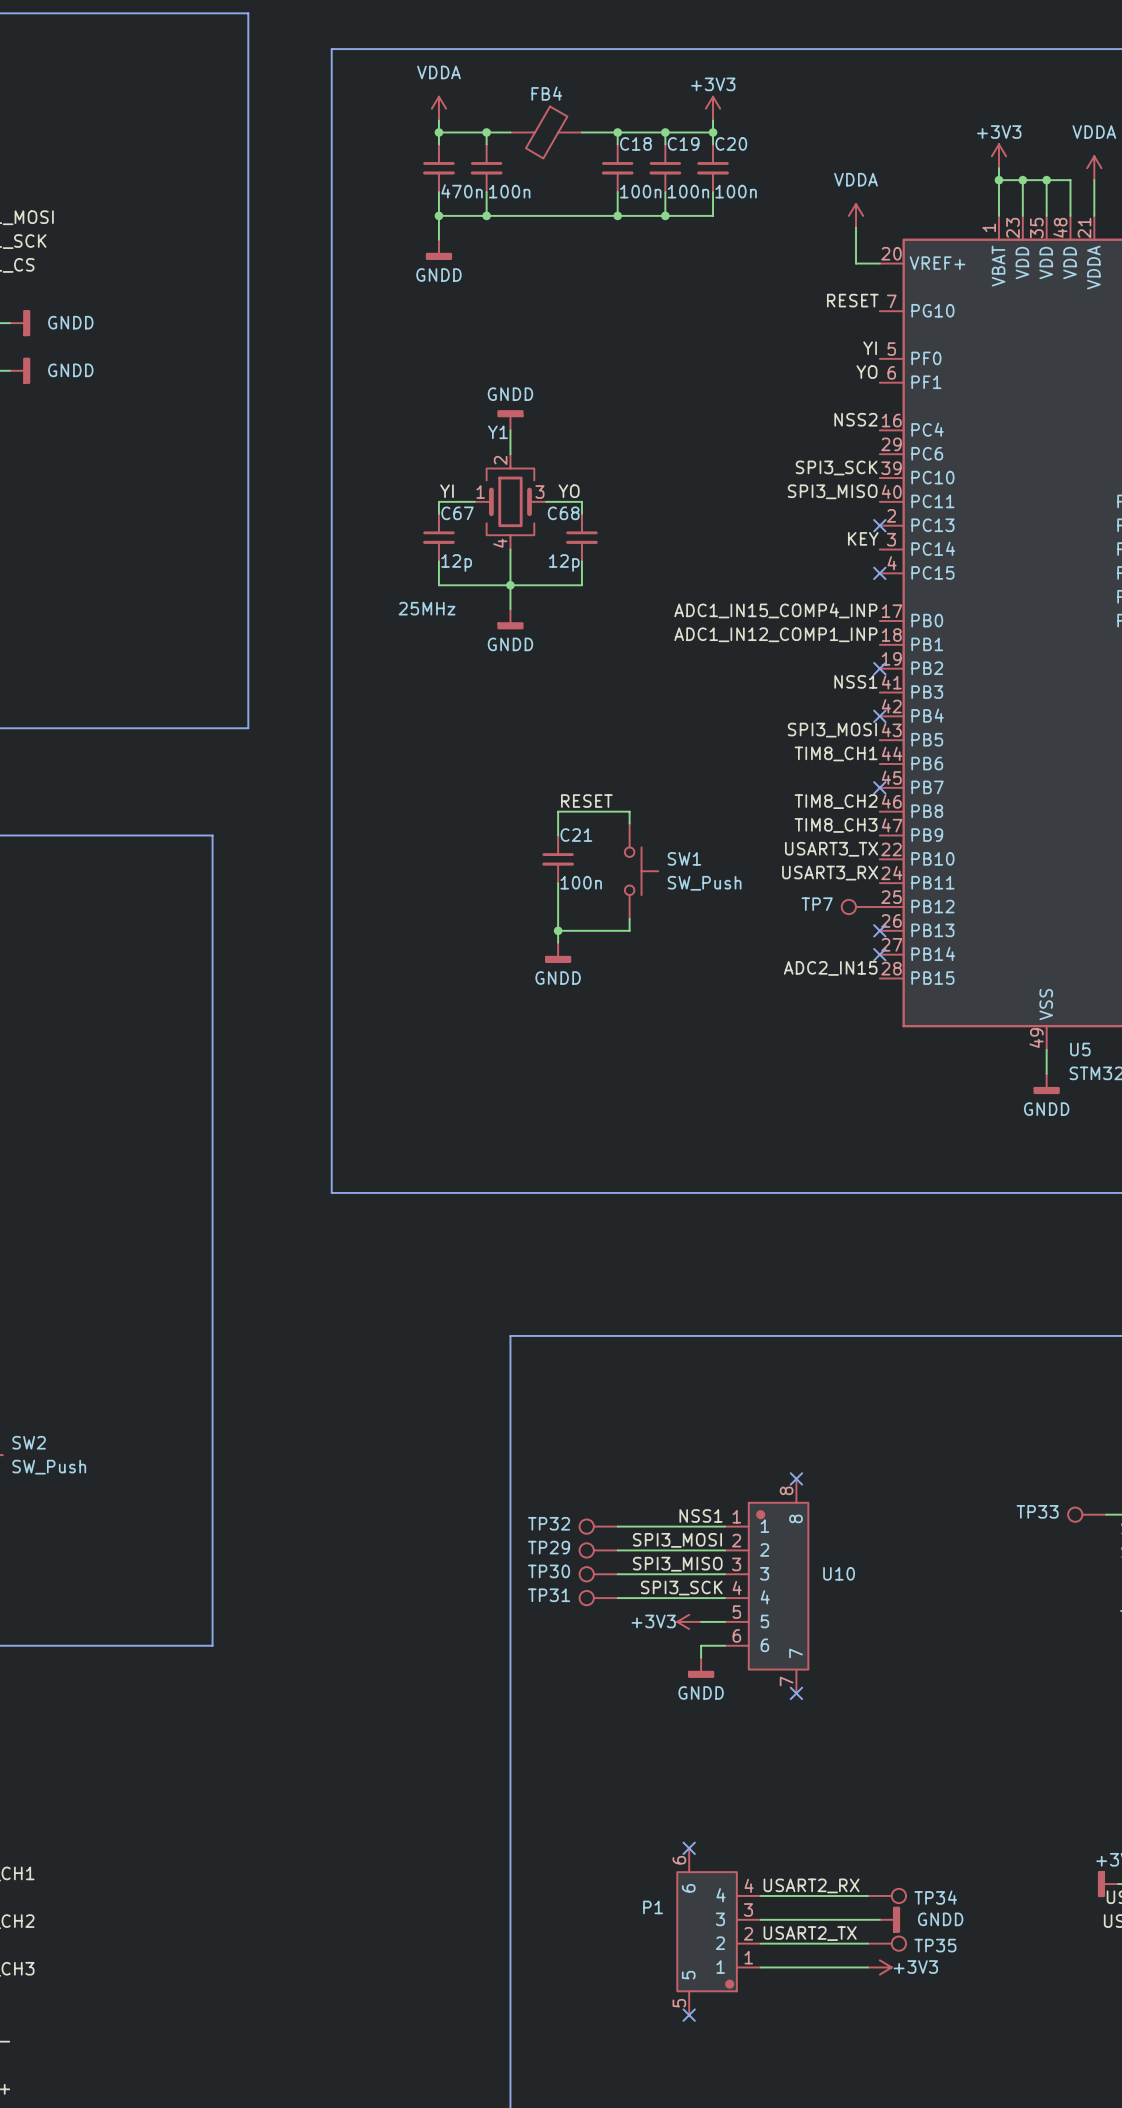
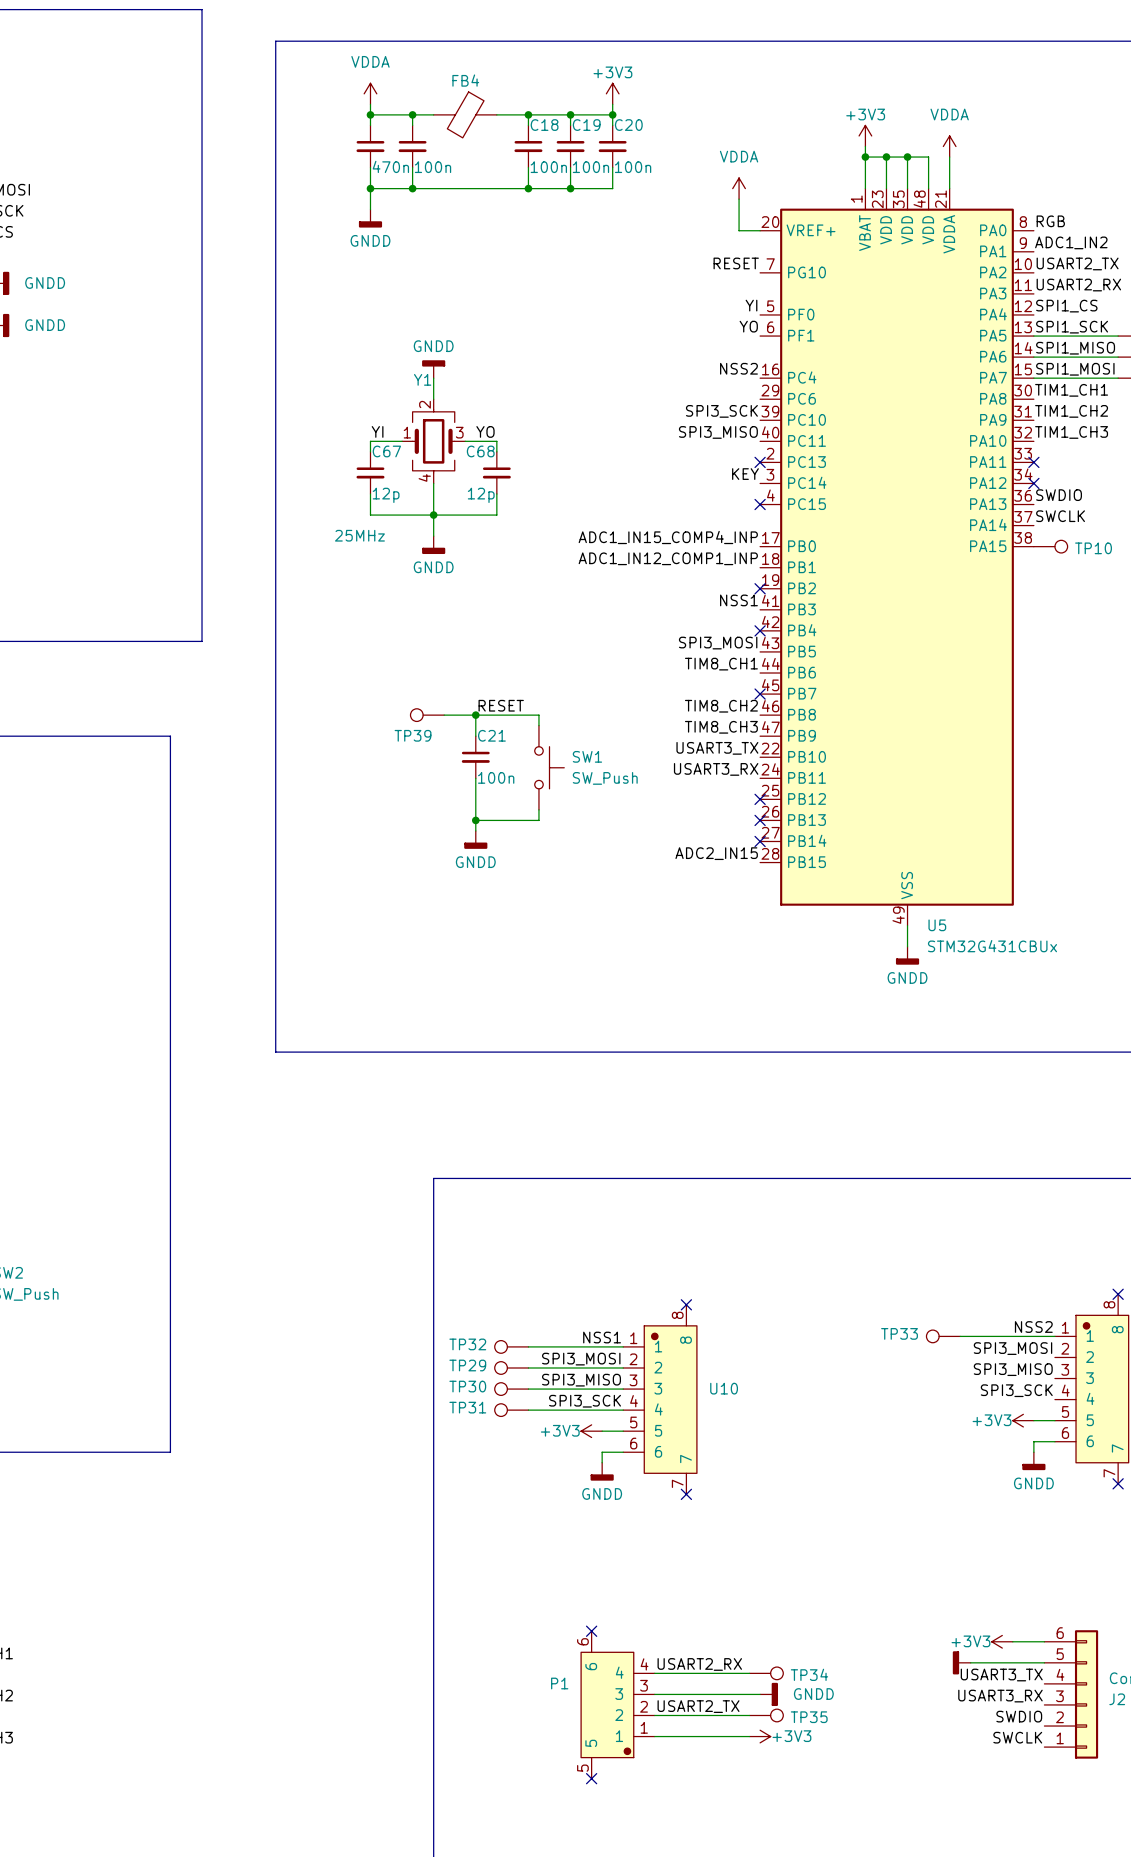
TP39: none -> (427, 715)
wire: none -> (444, 715) (475, 715)
junction: none -> (475, 715)
TP7: (860, 906) -> none
no-connect mark: none -> (760, 799)

